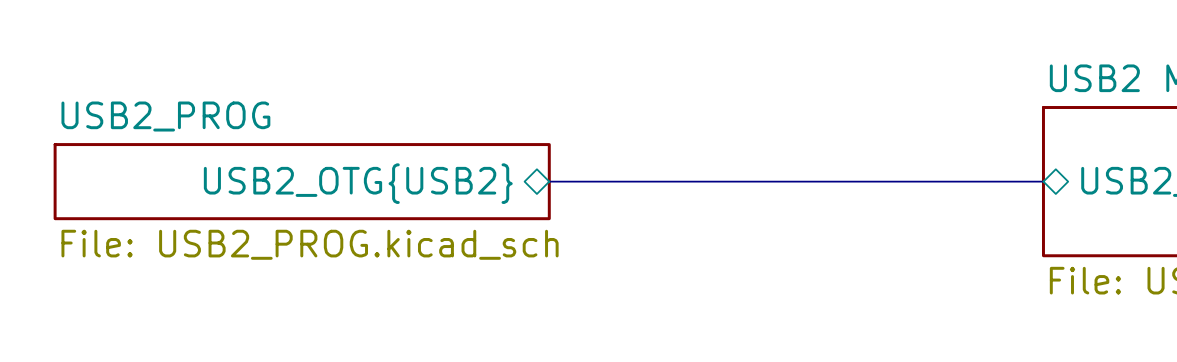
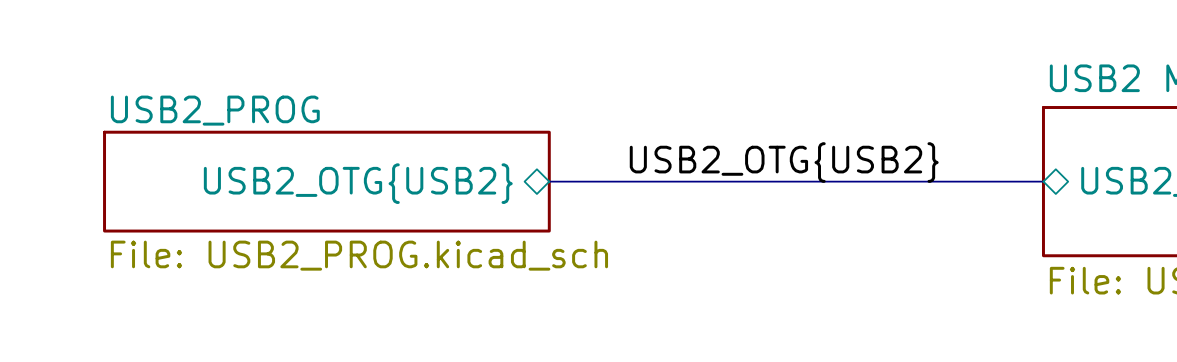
sheet USB2_PROG shape: [53, 143, 551, 221] -> [103, 130, 551, 233]
label: none -> USB2_OTG{USB2} (784, 162)

